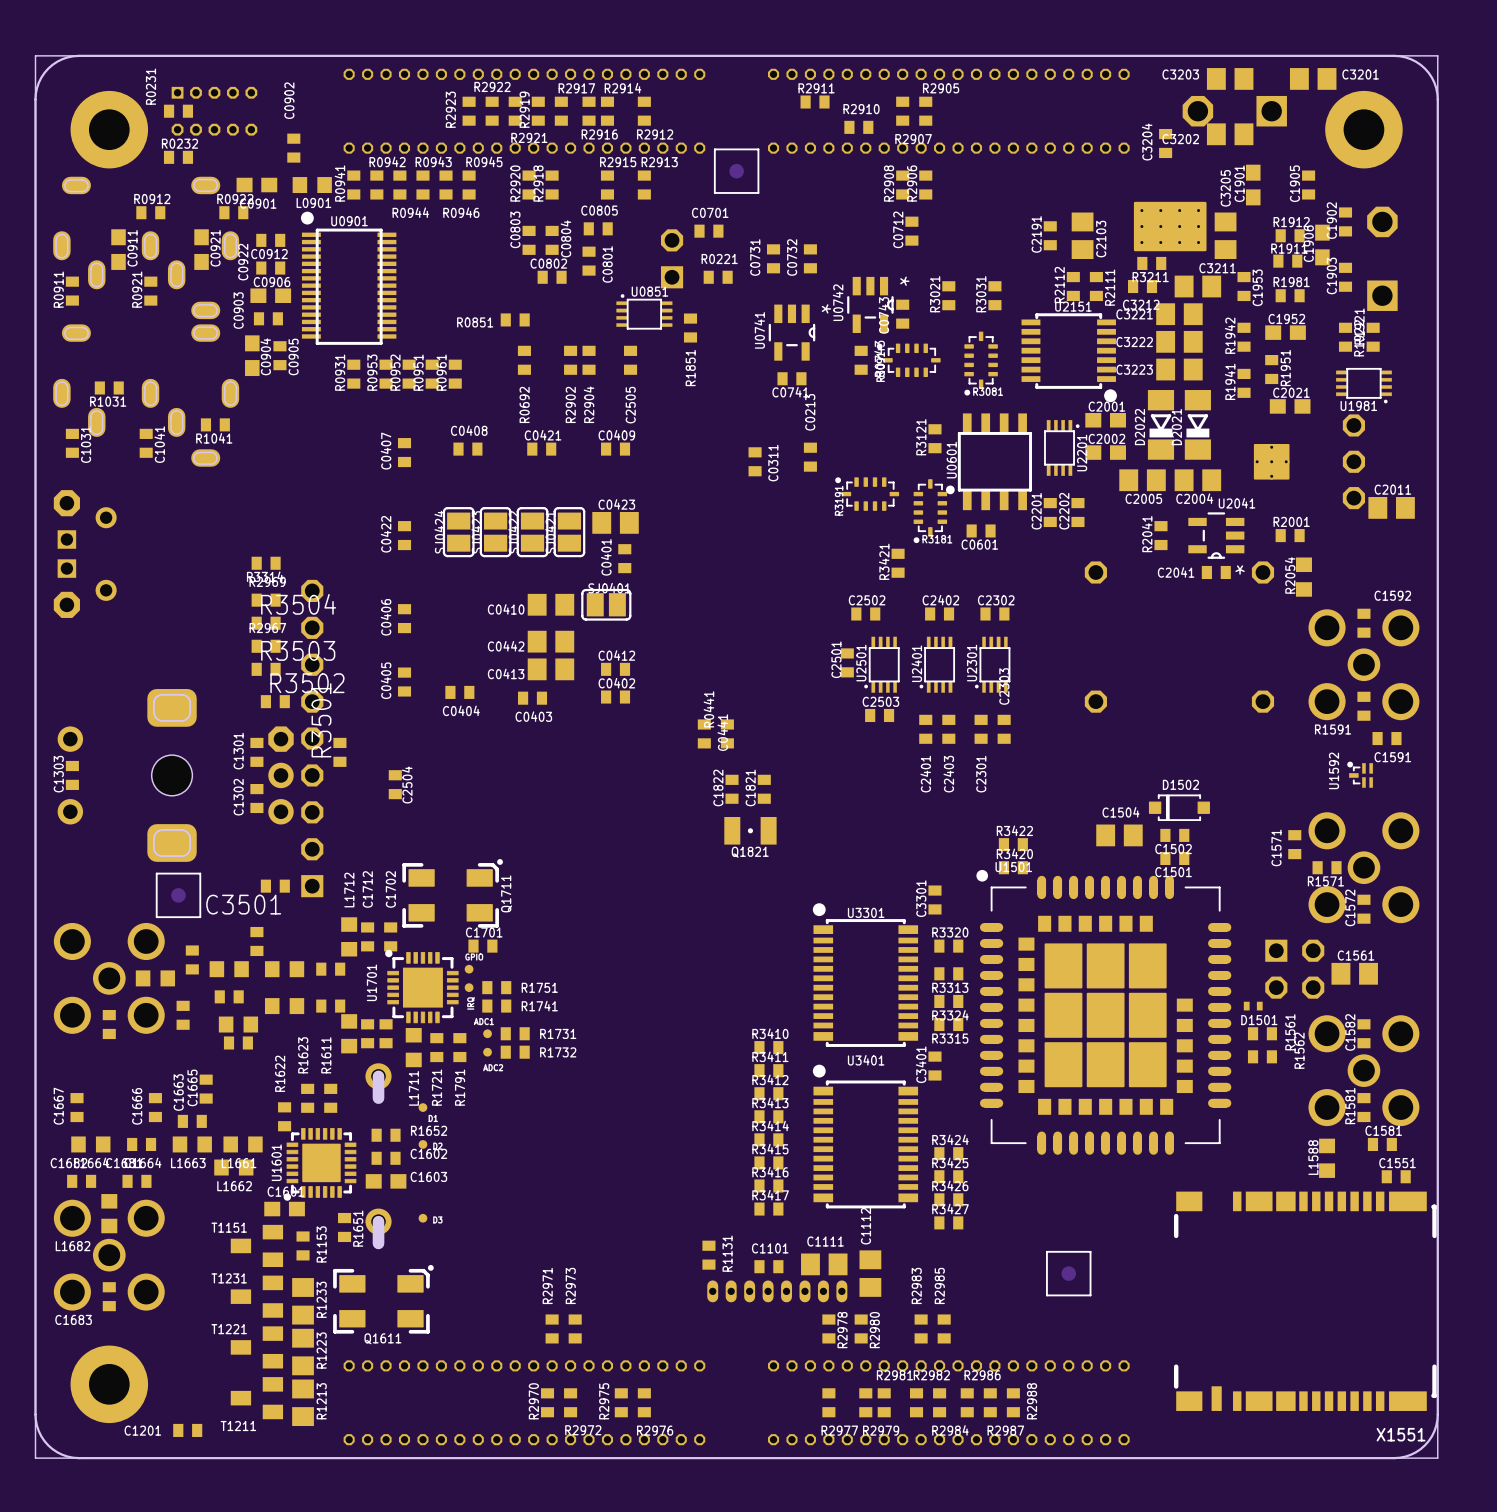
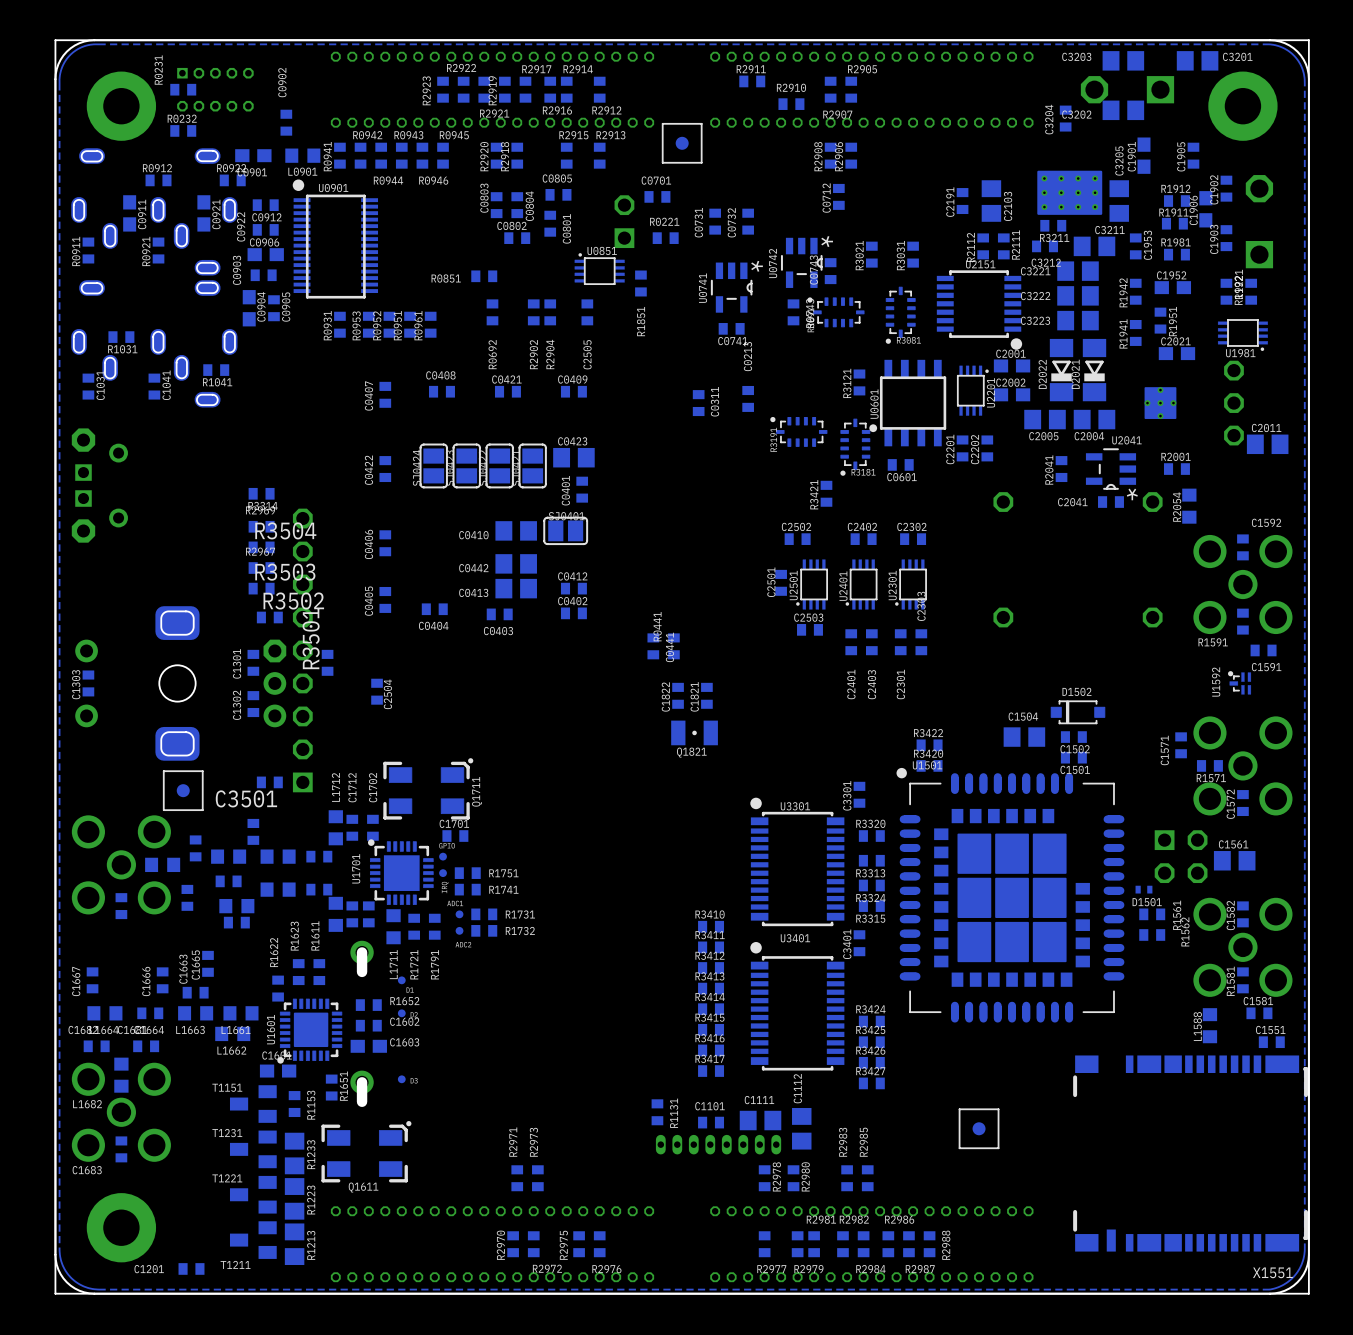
zone outline: none -> (1269, 44) (1283, 48) (1295, 56) (1302, 69) (1304, 83) (1304, 1250) (1301, 1264) (1294, 1276) (1283, 1285) (1269, 1289) (98, 1289) (83, 1286) (71, 1277) (62, 1265) (59, 1250) (59, 78) (62, 65) (70, 54) (81, 47) (94, 44) (1269, 44)

